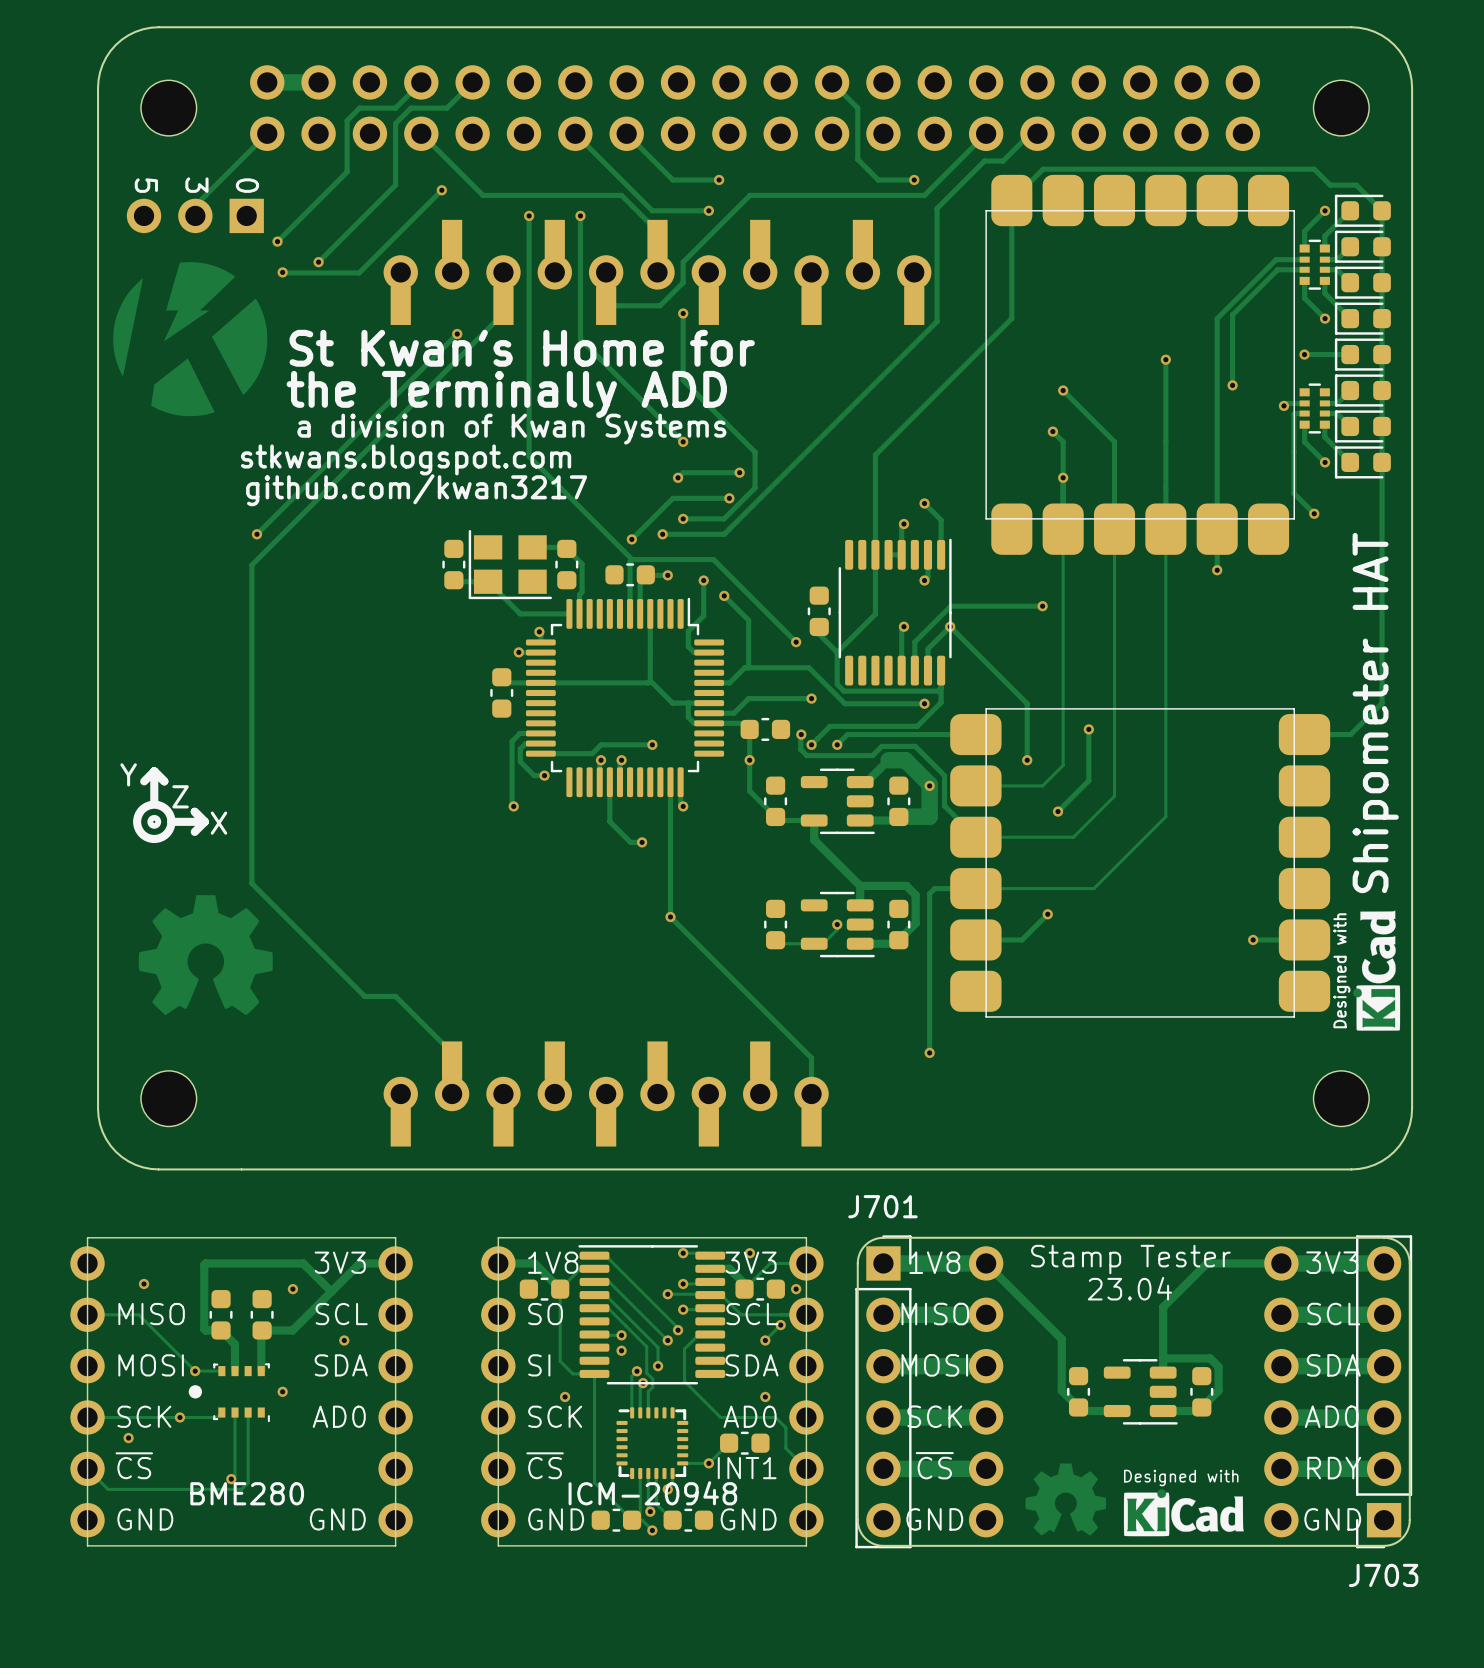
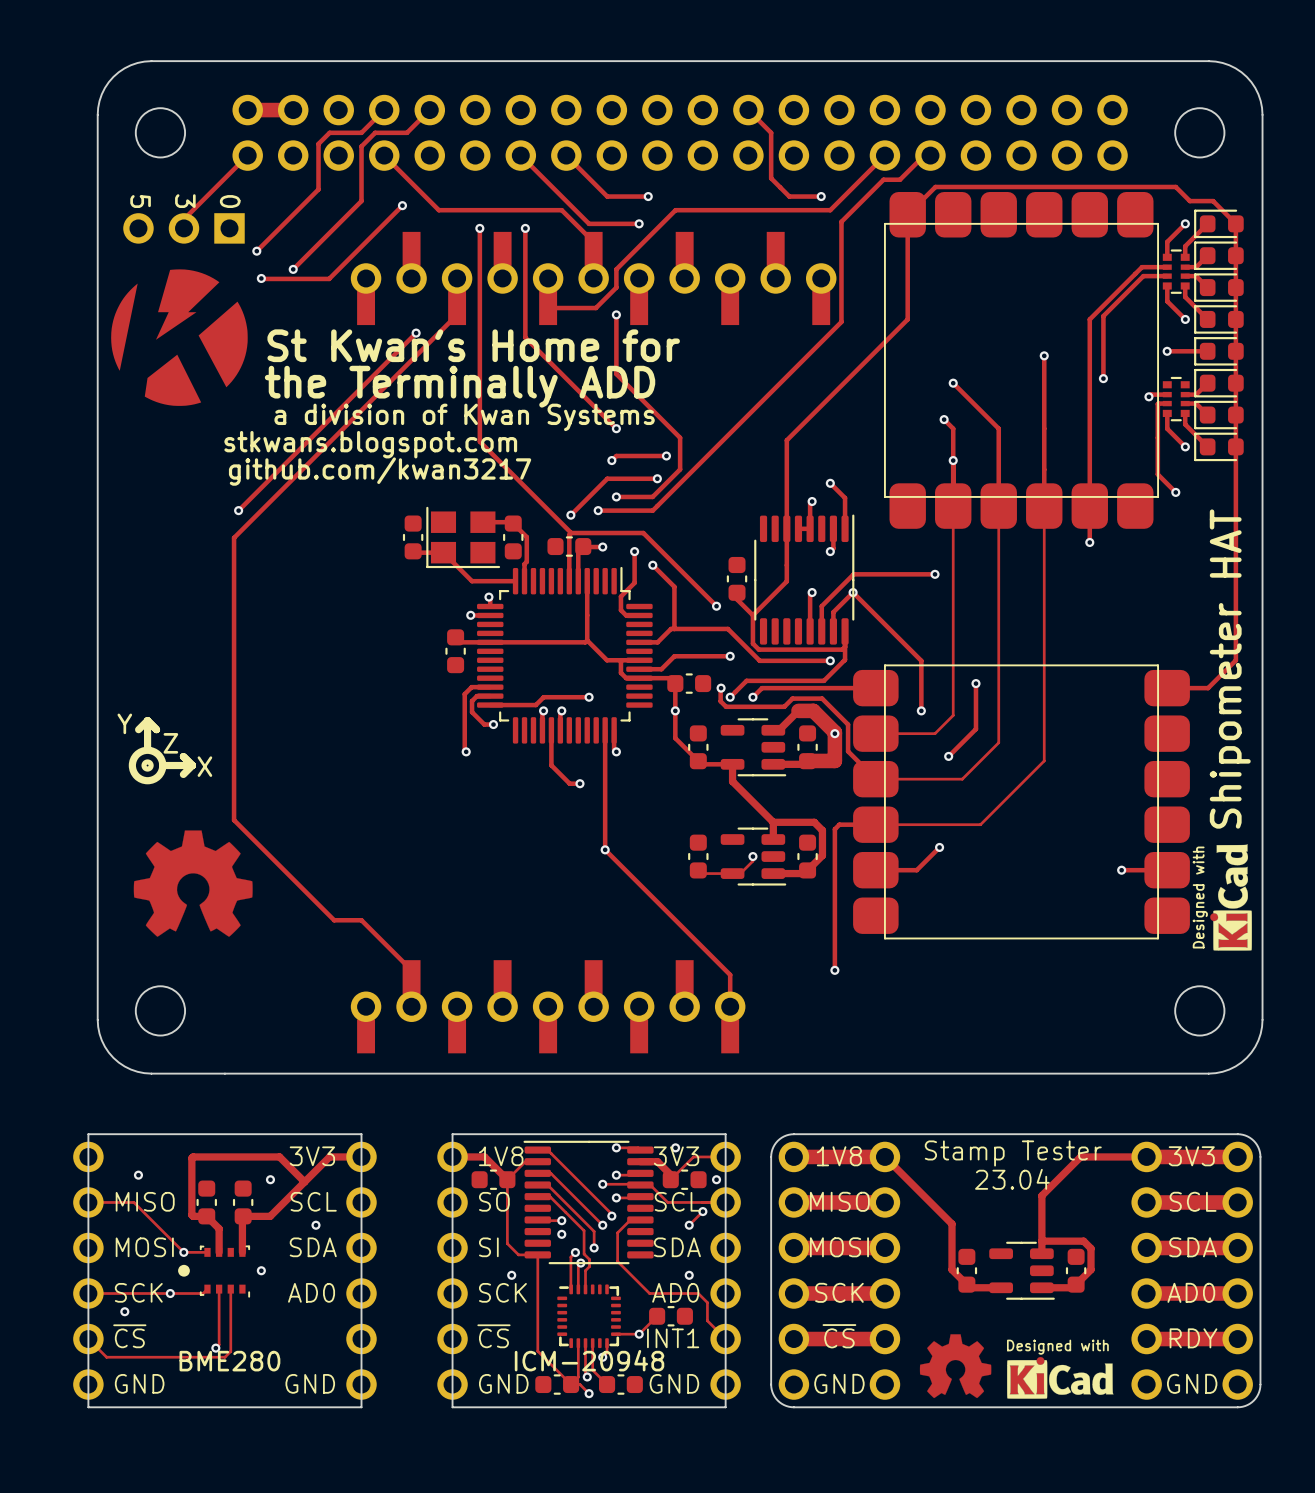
J701: (883, 1391) -> none
part: none -> (793, 1270)
J703: (1384, 1391) -> none
part: none -> (1237, 1270)

